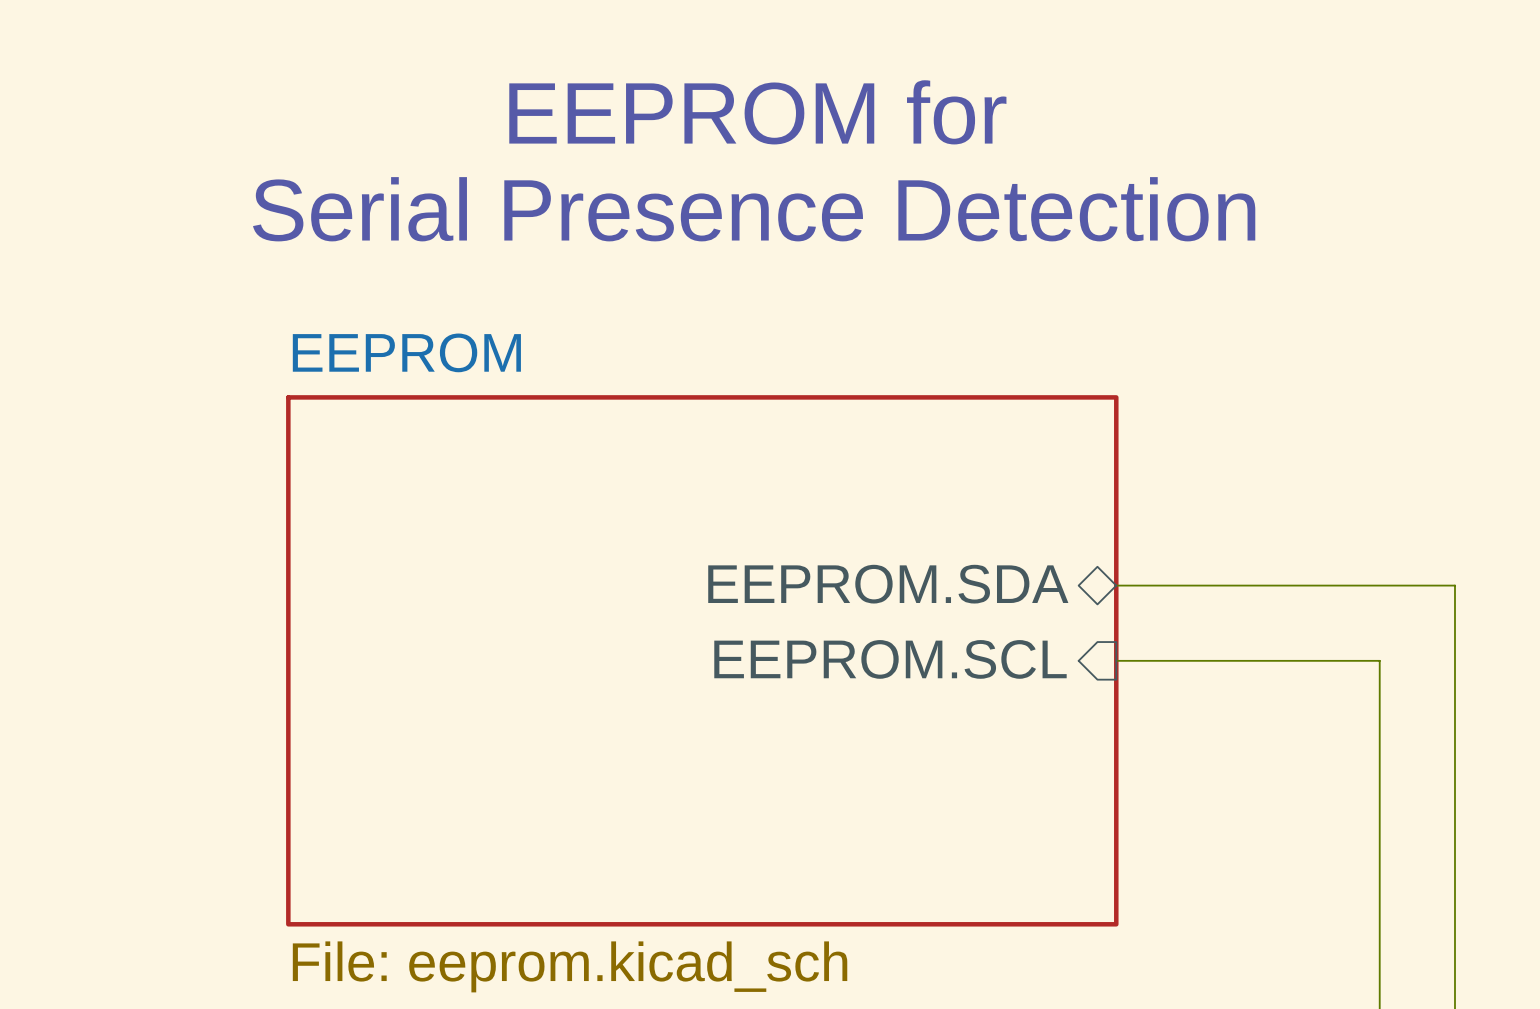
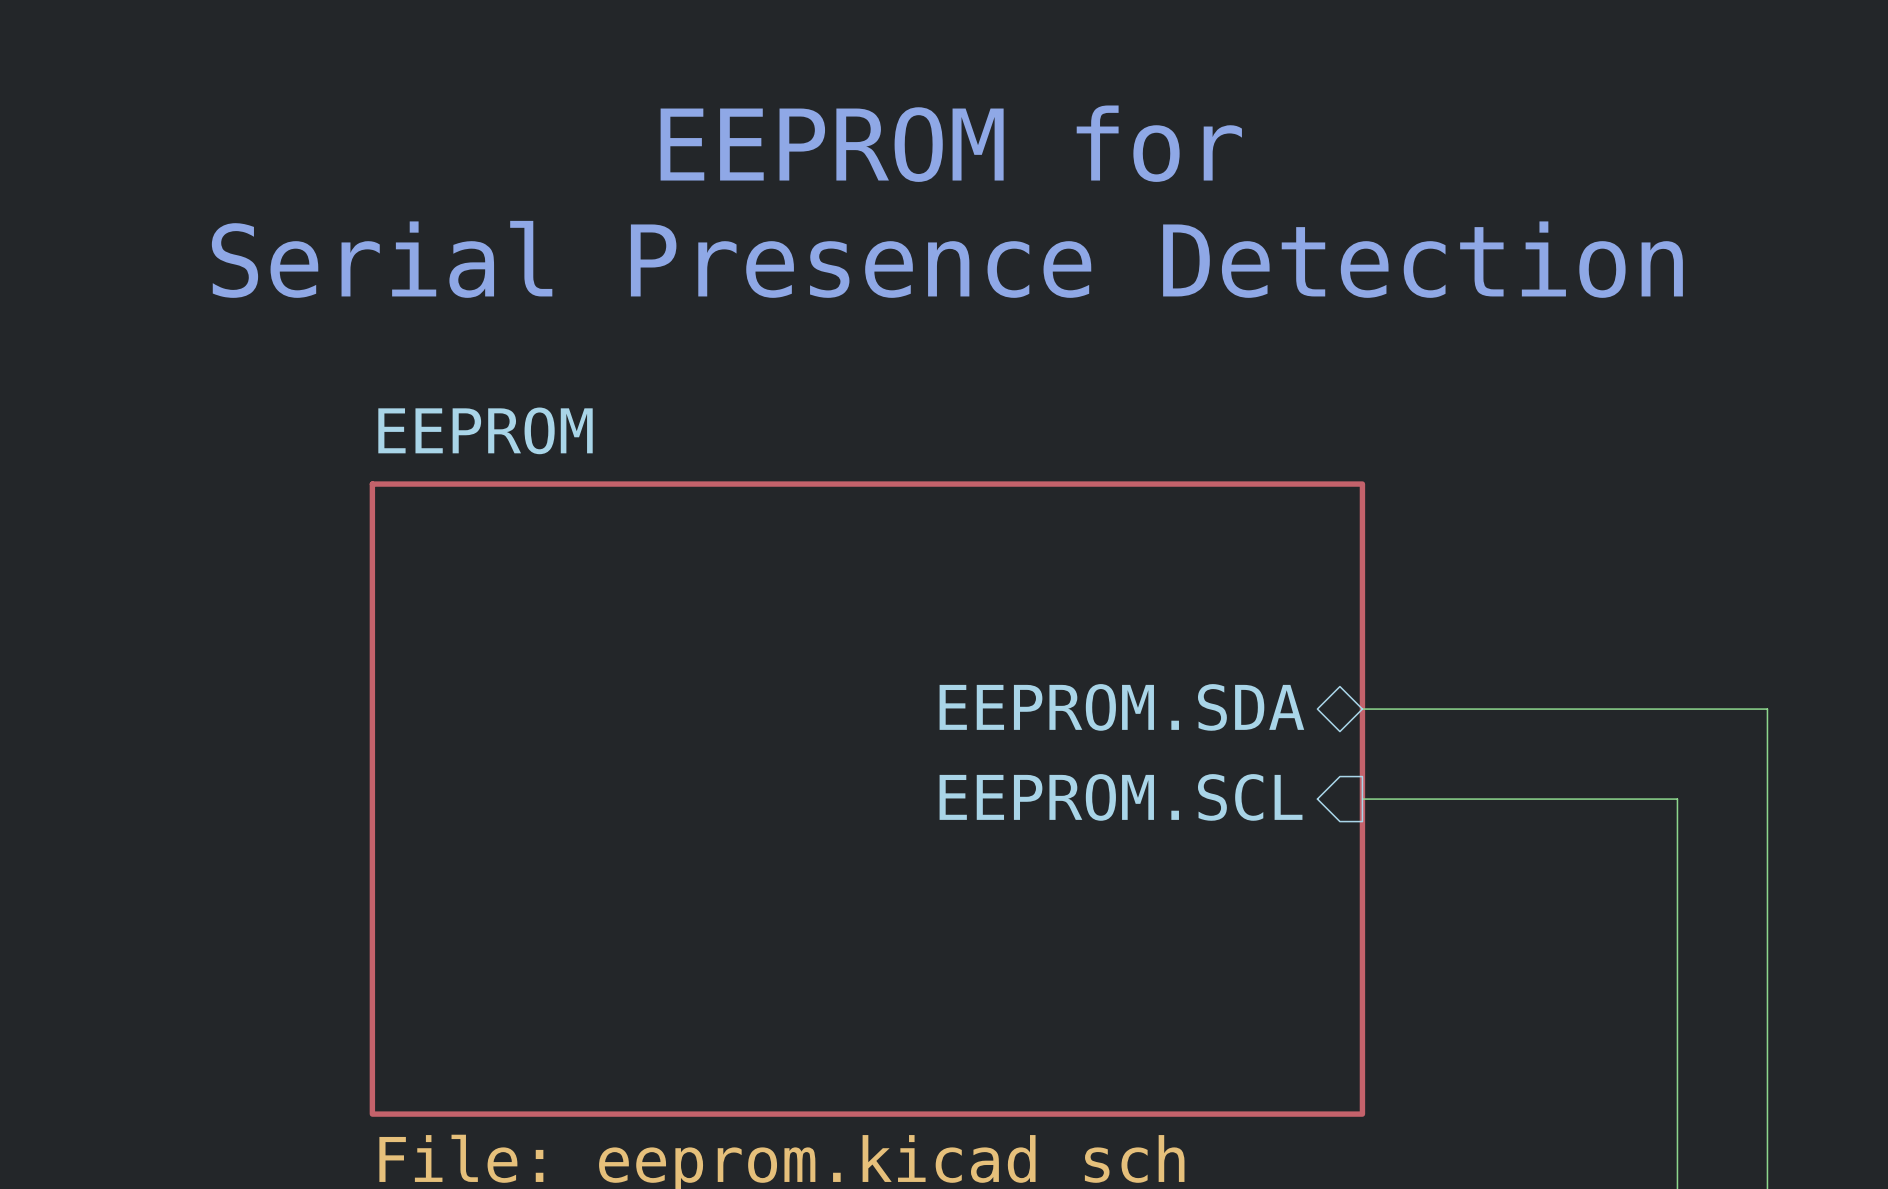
text position: EEPROM for (757, 112) -> EEPROM for (951, 143)
text position: Serial Presence Detection (754, 209) -> Serial Presence Detection (947, 259)

